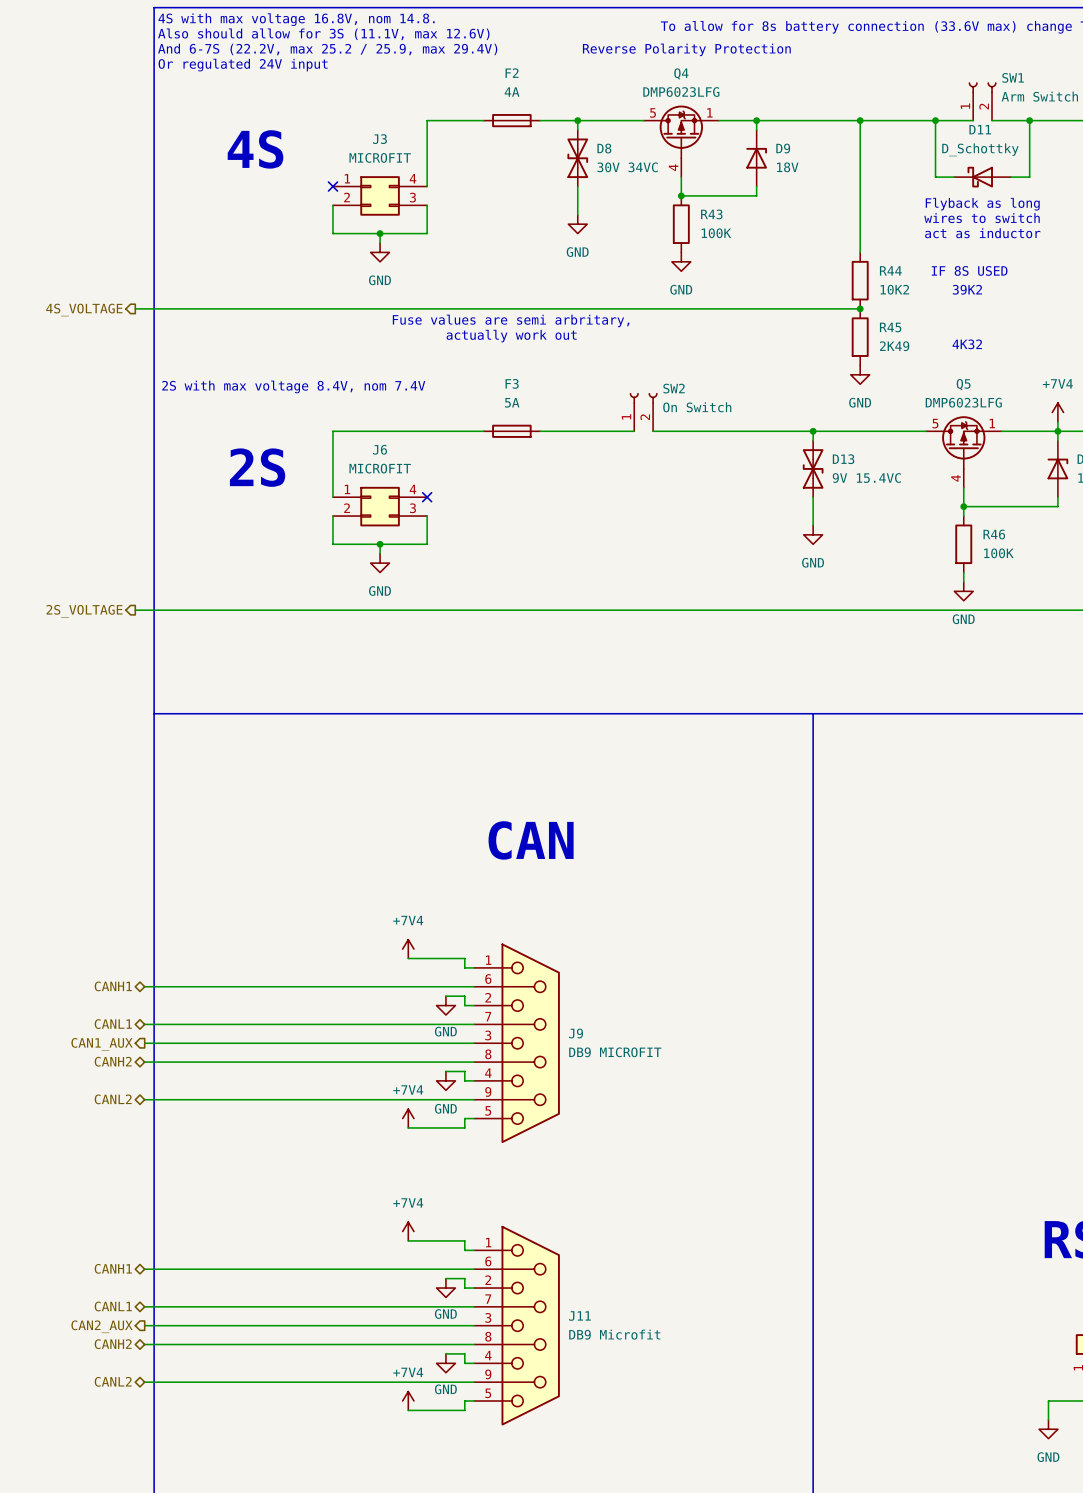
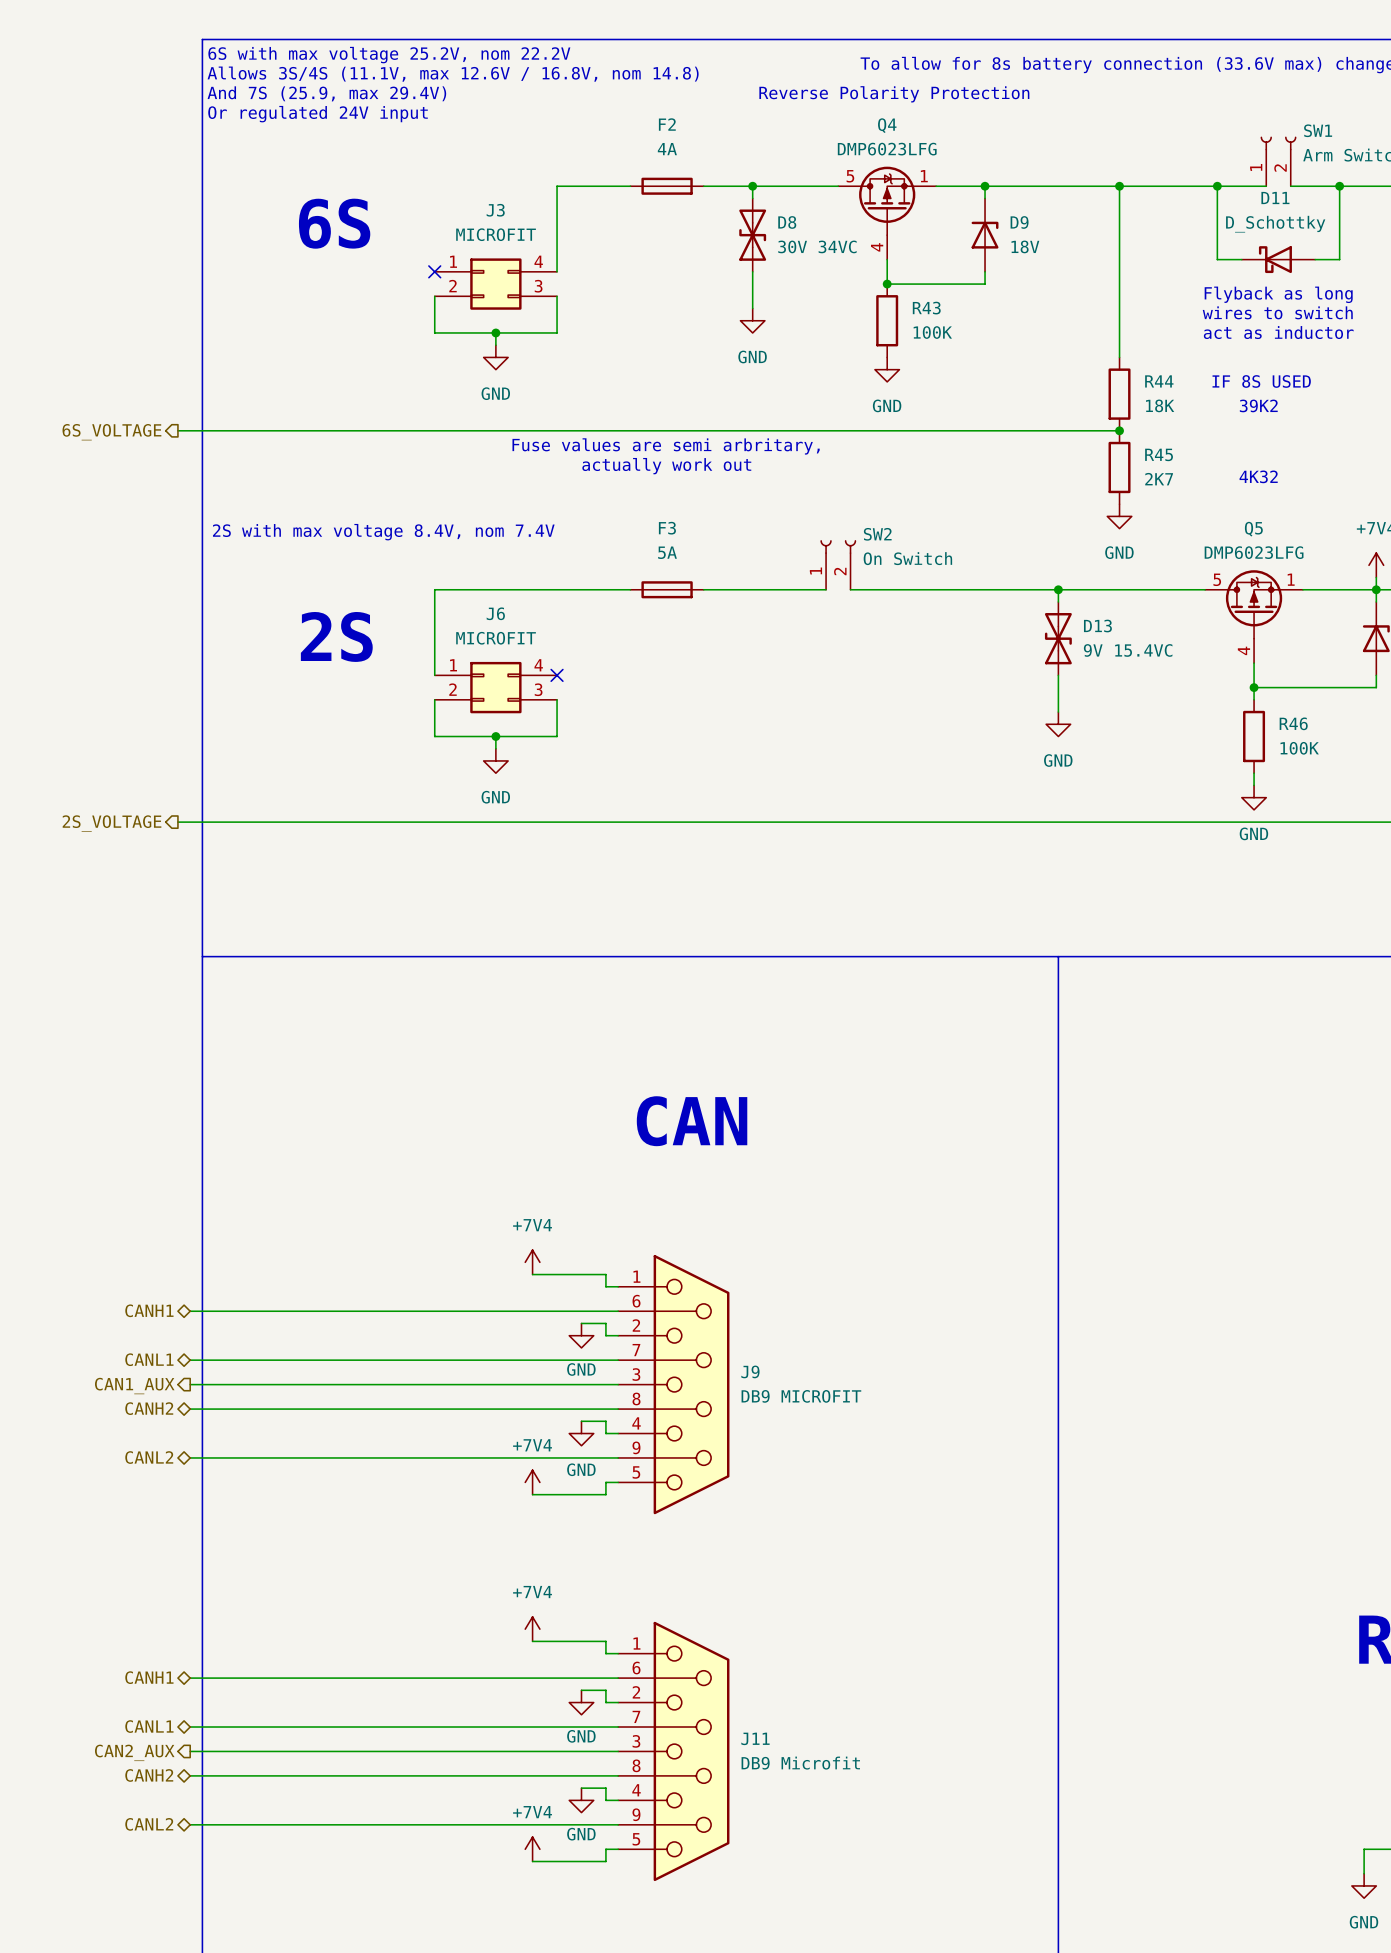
text: 4S with max voltage 16.8V, nom 14.8. (296, 19) -> 6S with max voltage 25.2V, nom 22.2V (389, 55)
text: Also should allow for 3S (11.1V, max 12.6V) (323, 34) -> Allows 3S/4S (11.1V, max 12.6V / 16.8V, nom 14.8) (453, 74)
text: And 6-7S (22.2V, max 25.2 / 25.9, max 29.4V) (327, 49) -> And 7S (25.9, max 29.4V) (326, 93)
text: 4S (255, 149) -> 6S (334, 223)
R44 value: 10K2 (894, 289) -> 18K (1160, 405)
hierarchical label: 4S_VOLTAGE (84, 309) -> 6S_VOLTAGE (111, 432)
R45 value: 2K49 (894, 346) -> 2K7 (1159, 479)

